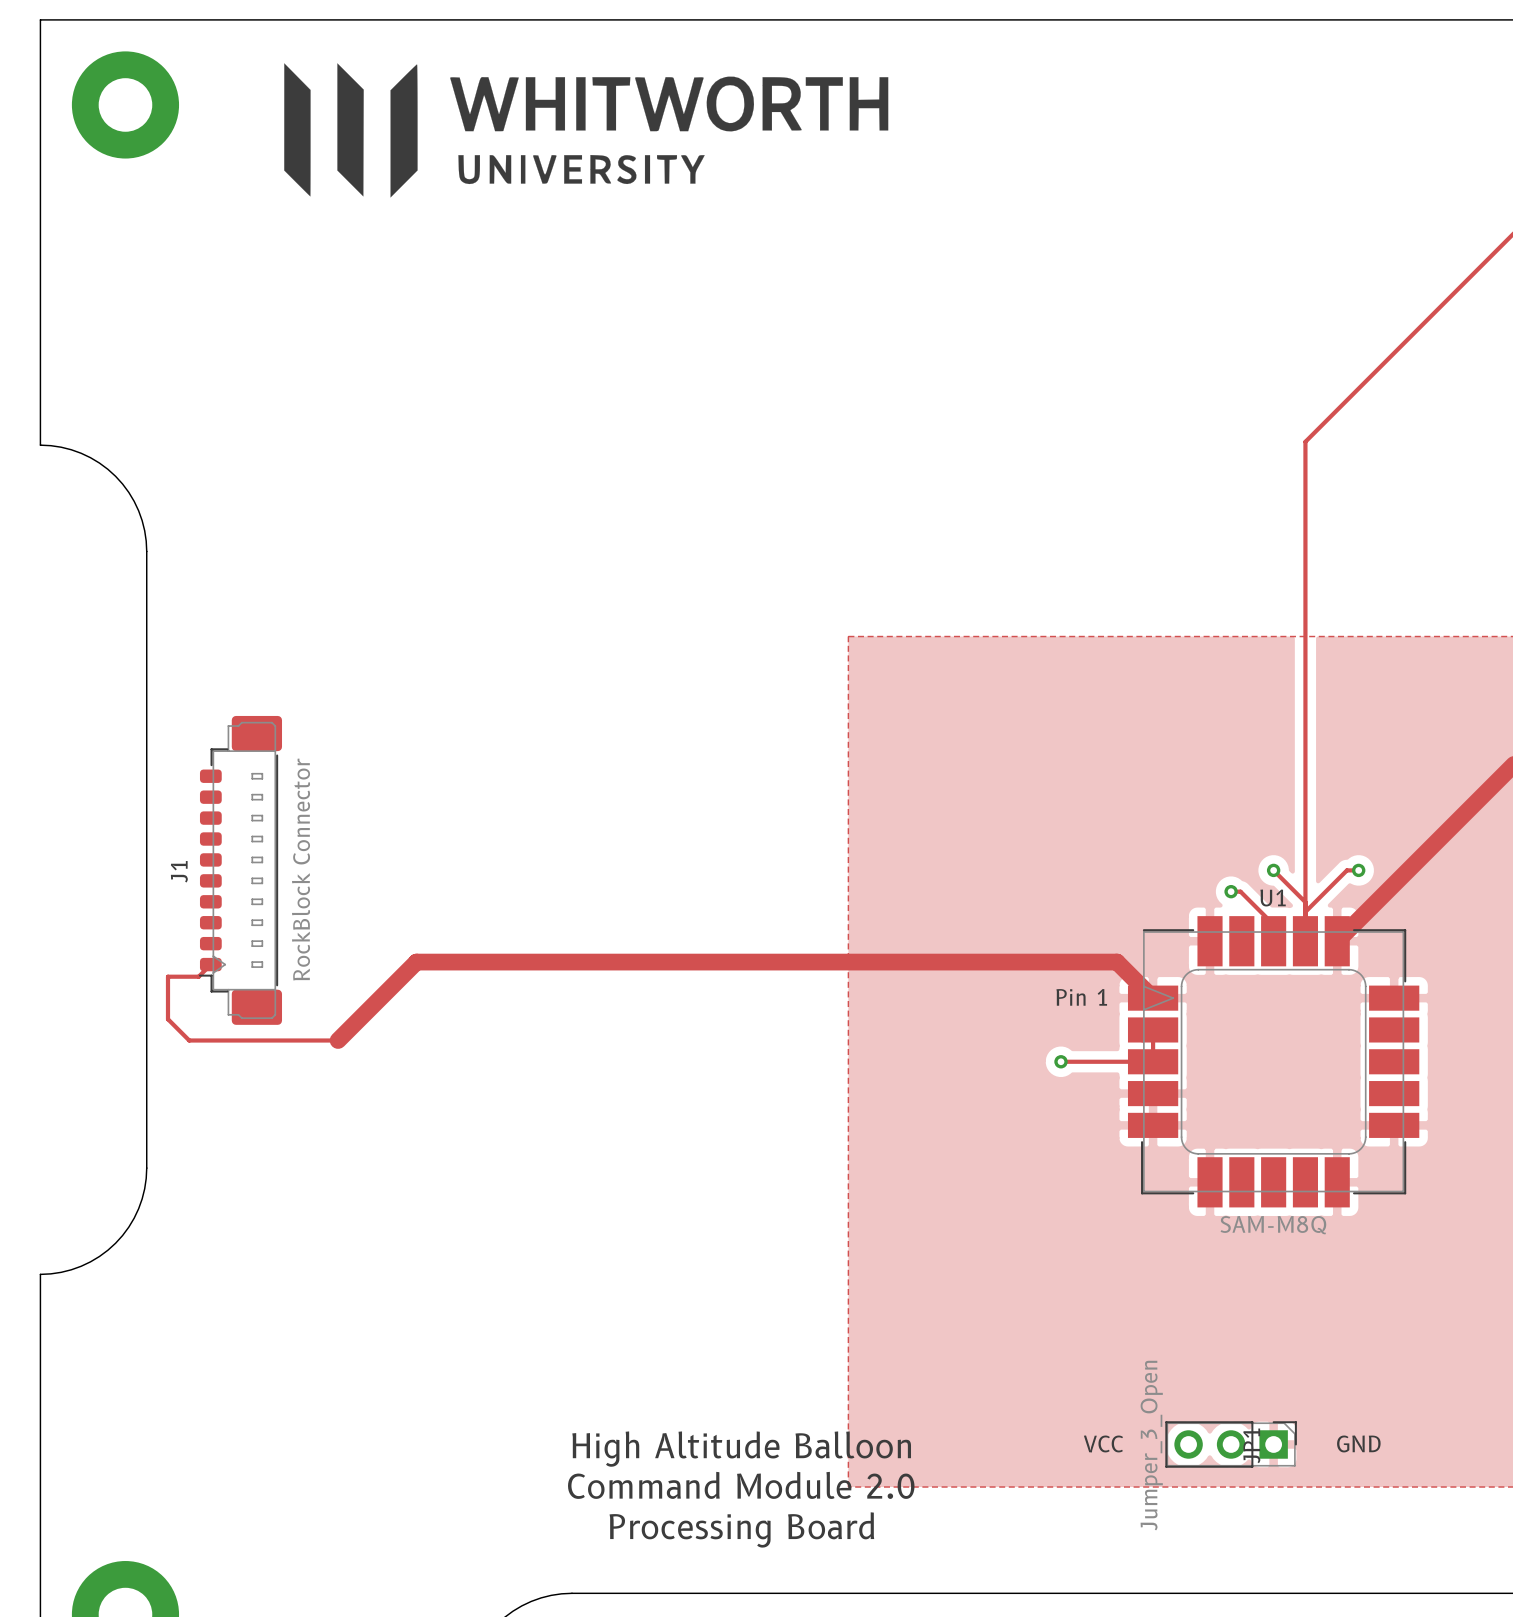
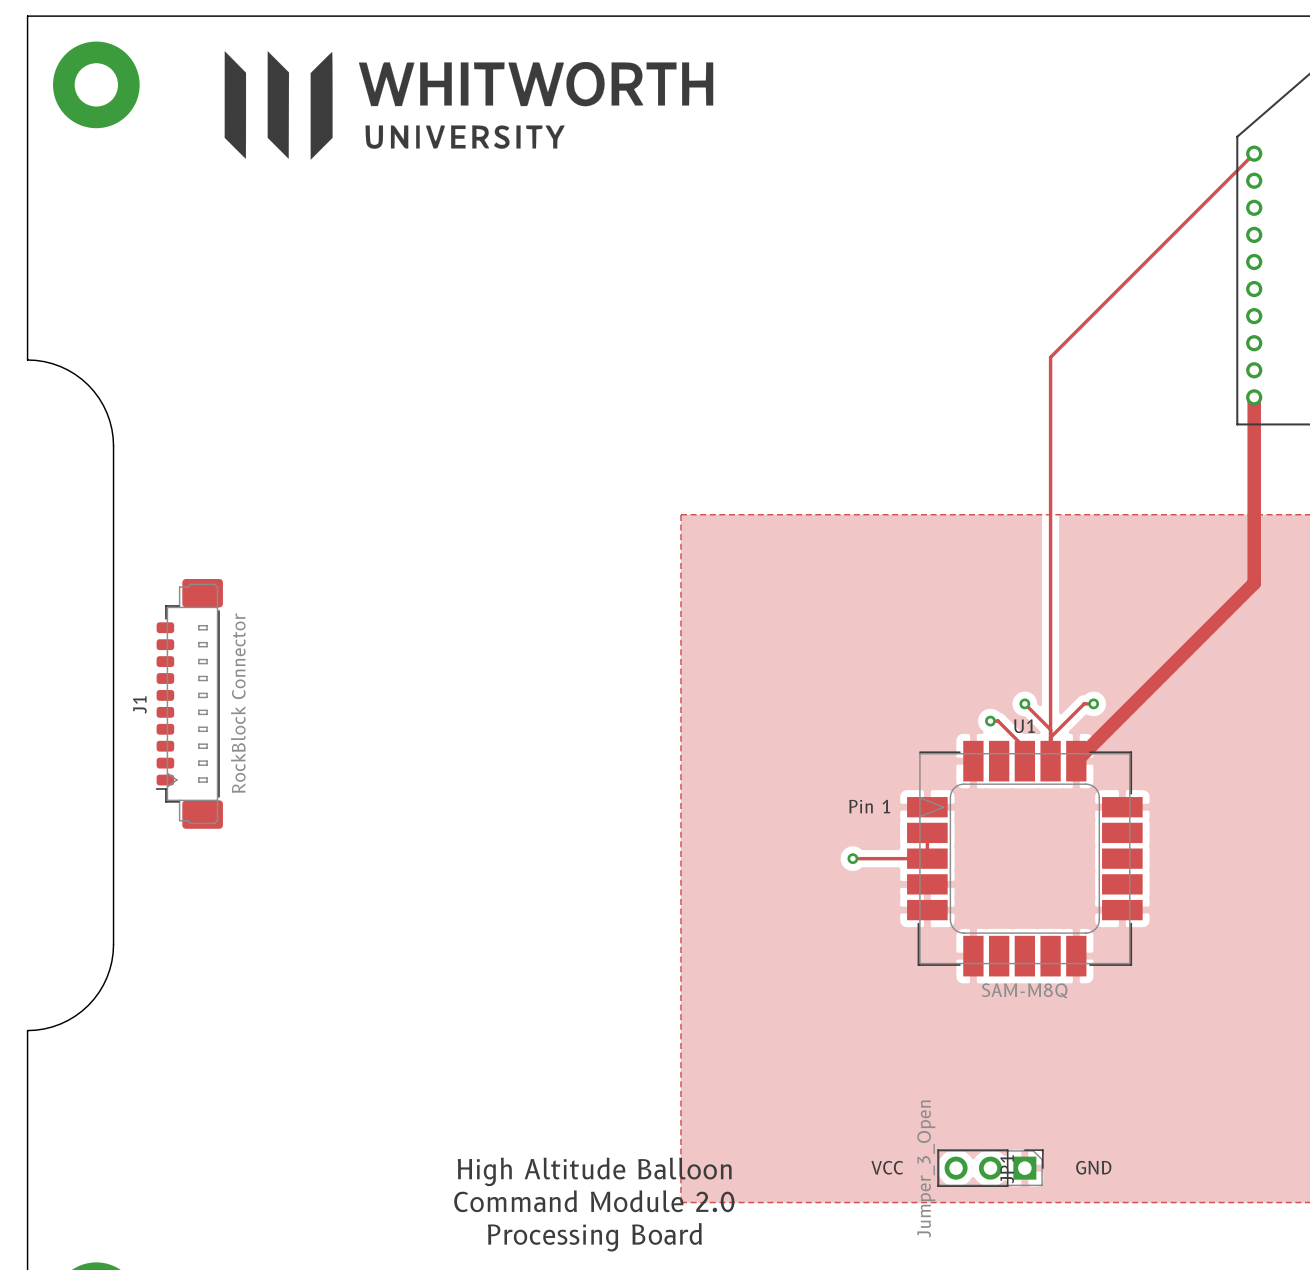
track: (210, 964) (198, 976) (167, 976) (167, 1019) (189, 1040) (338, 1040) (416, 962) (1117, 962) (1153, 998) -> none

